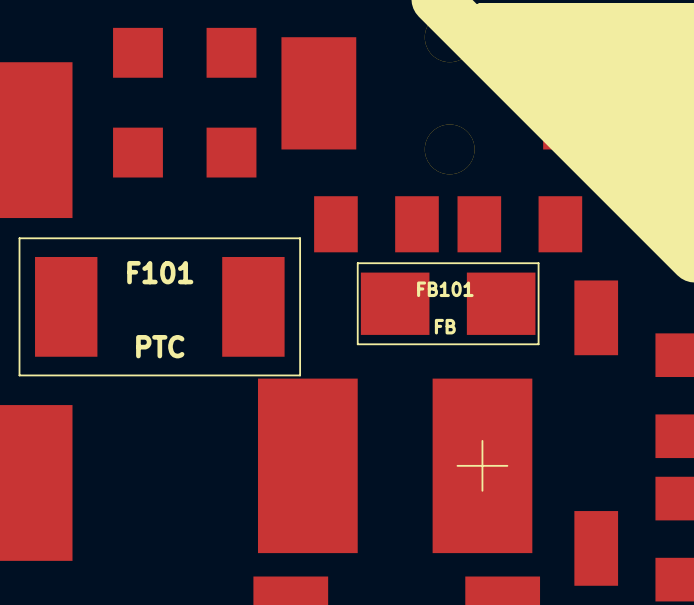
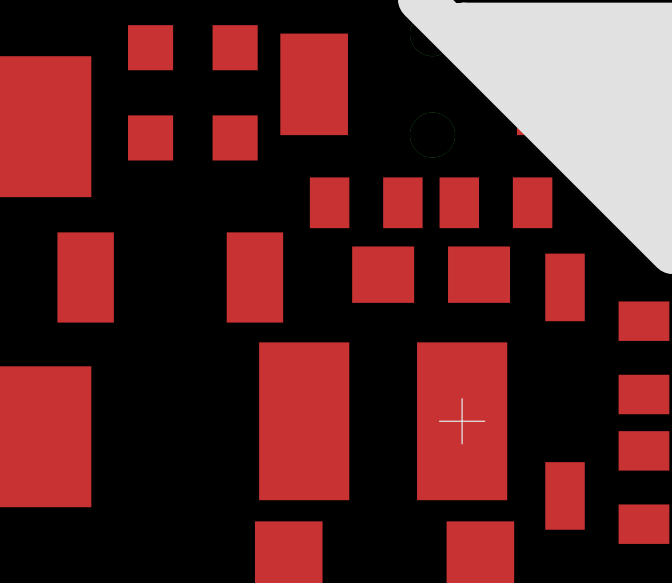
FB101: FB (448, 303) -> none
part: none -> (431, 274)
F101: PTC (159, 306) -> none

